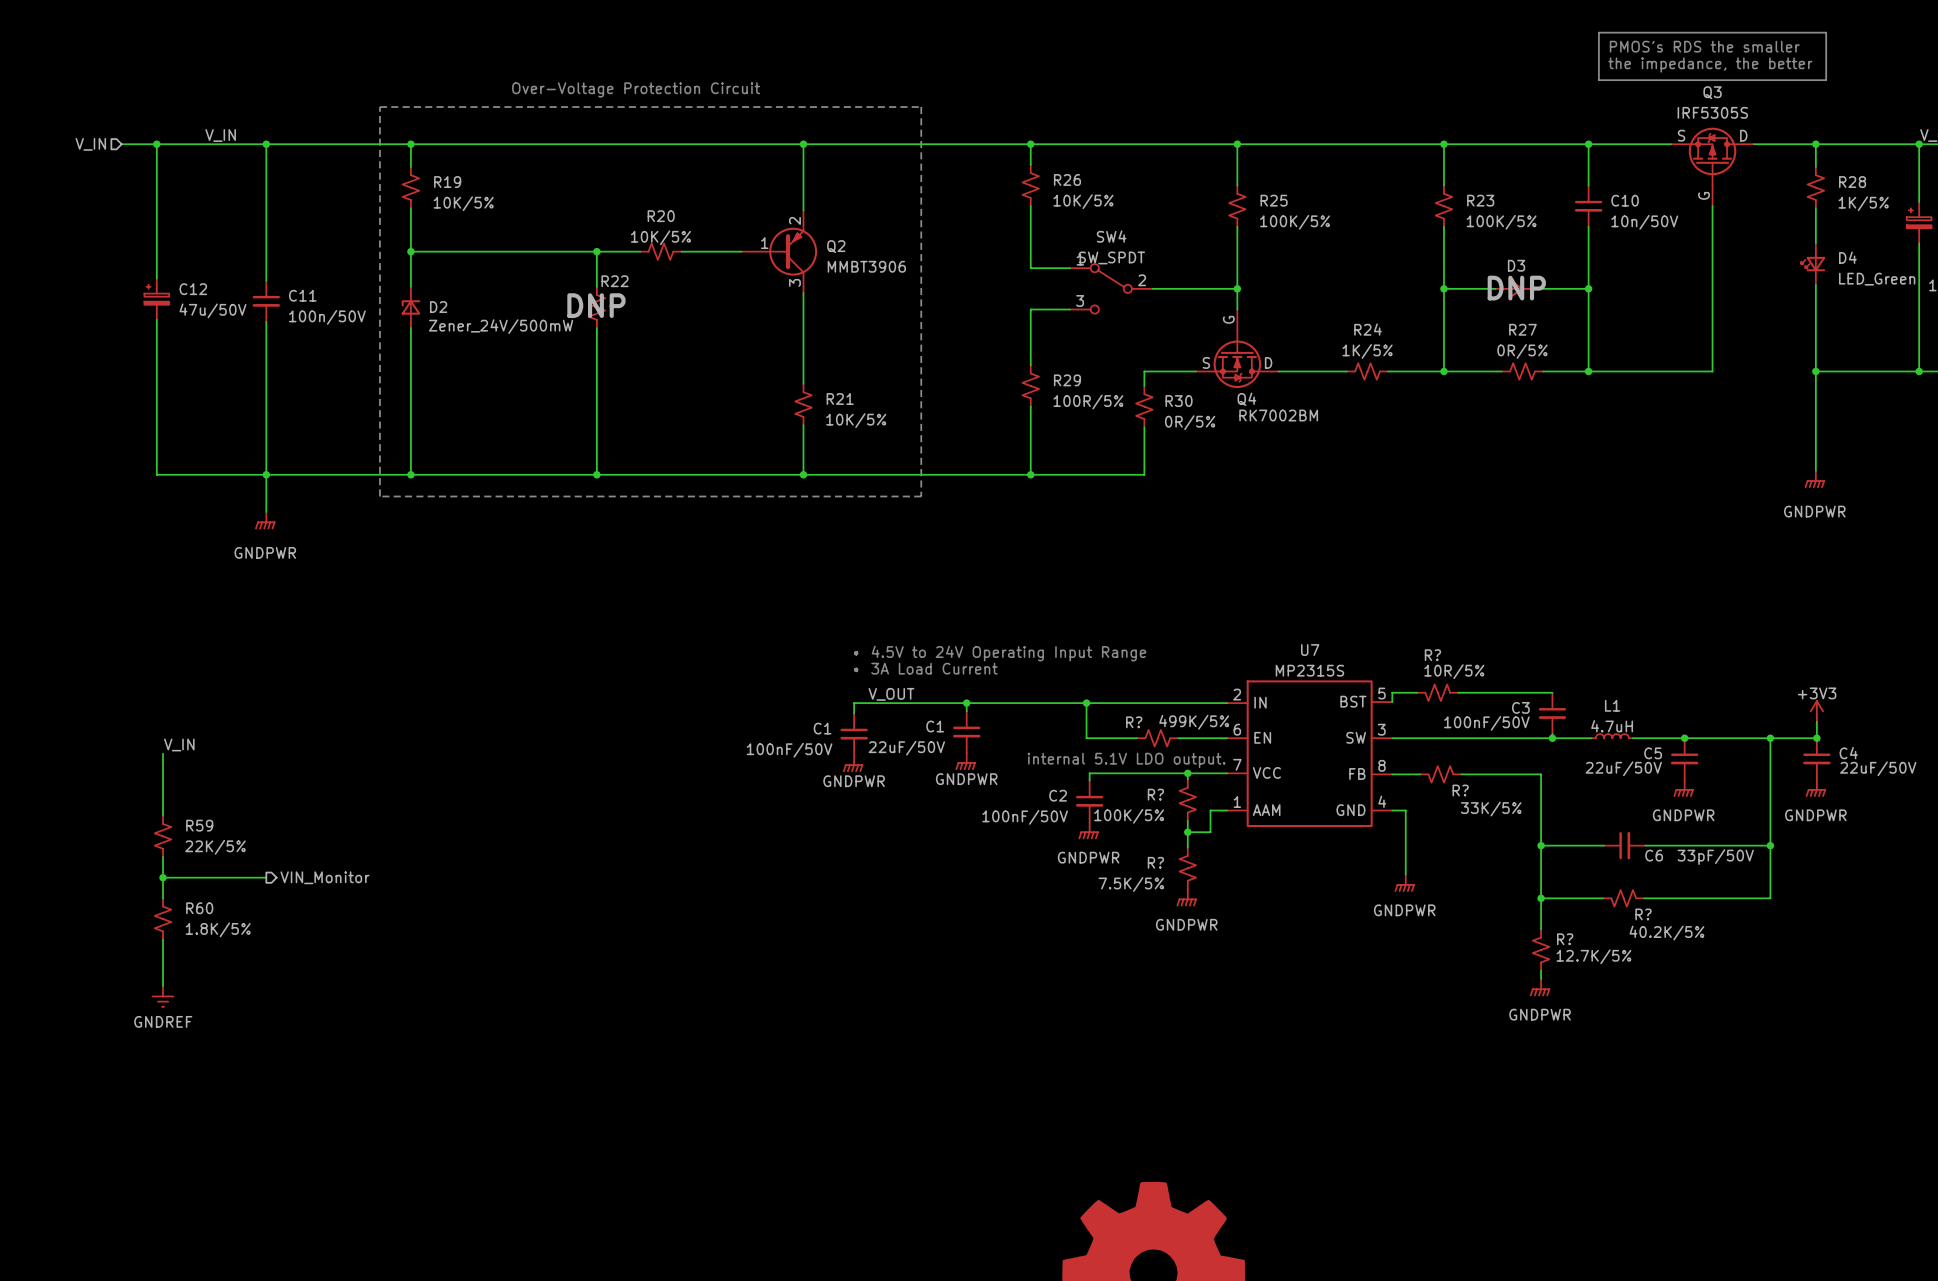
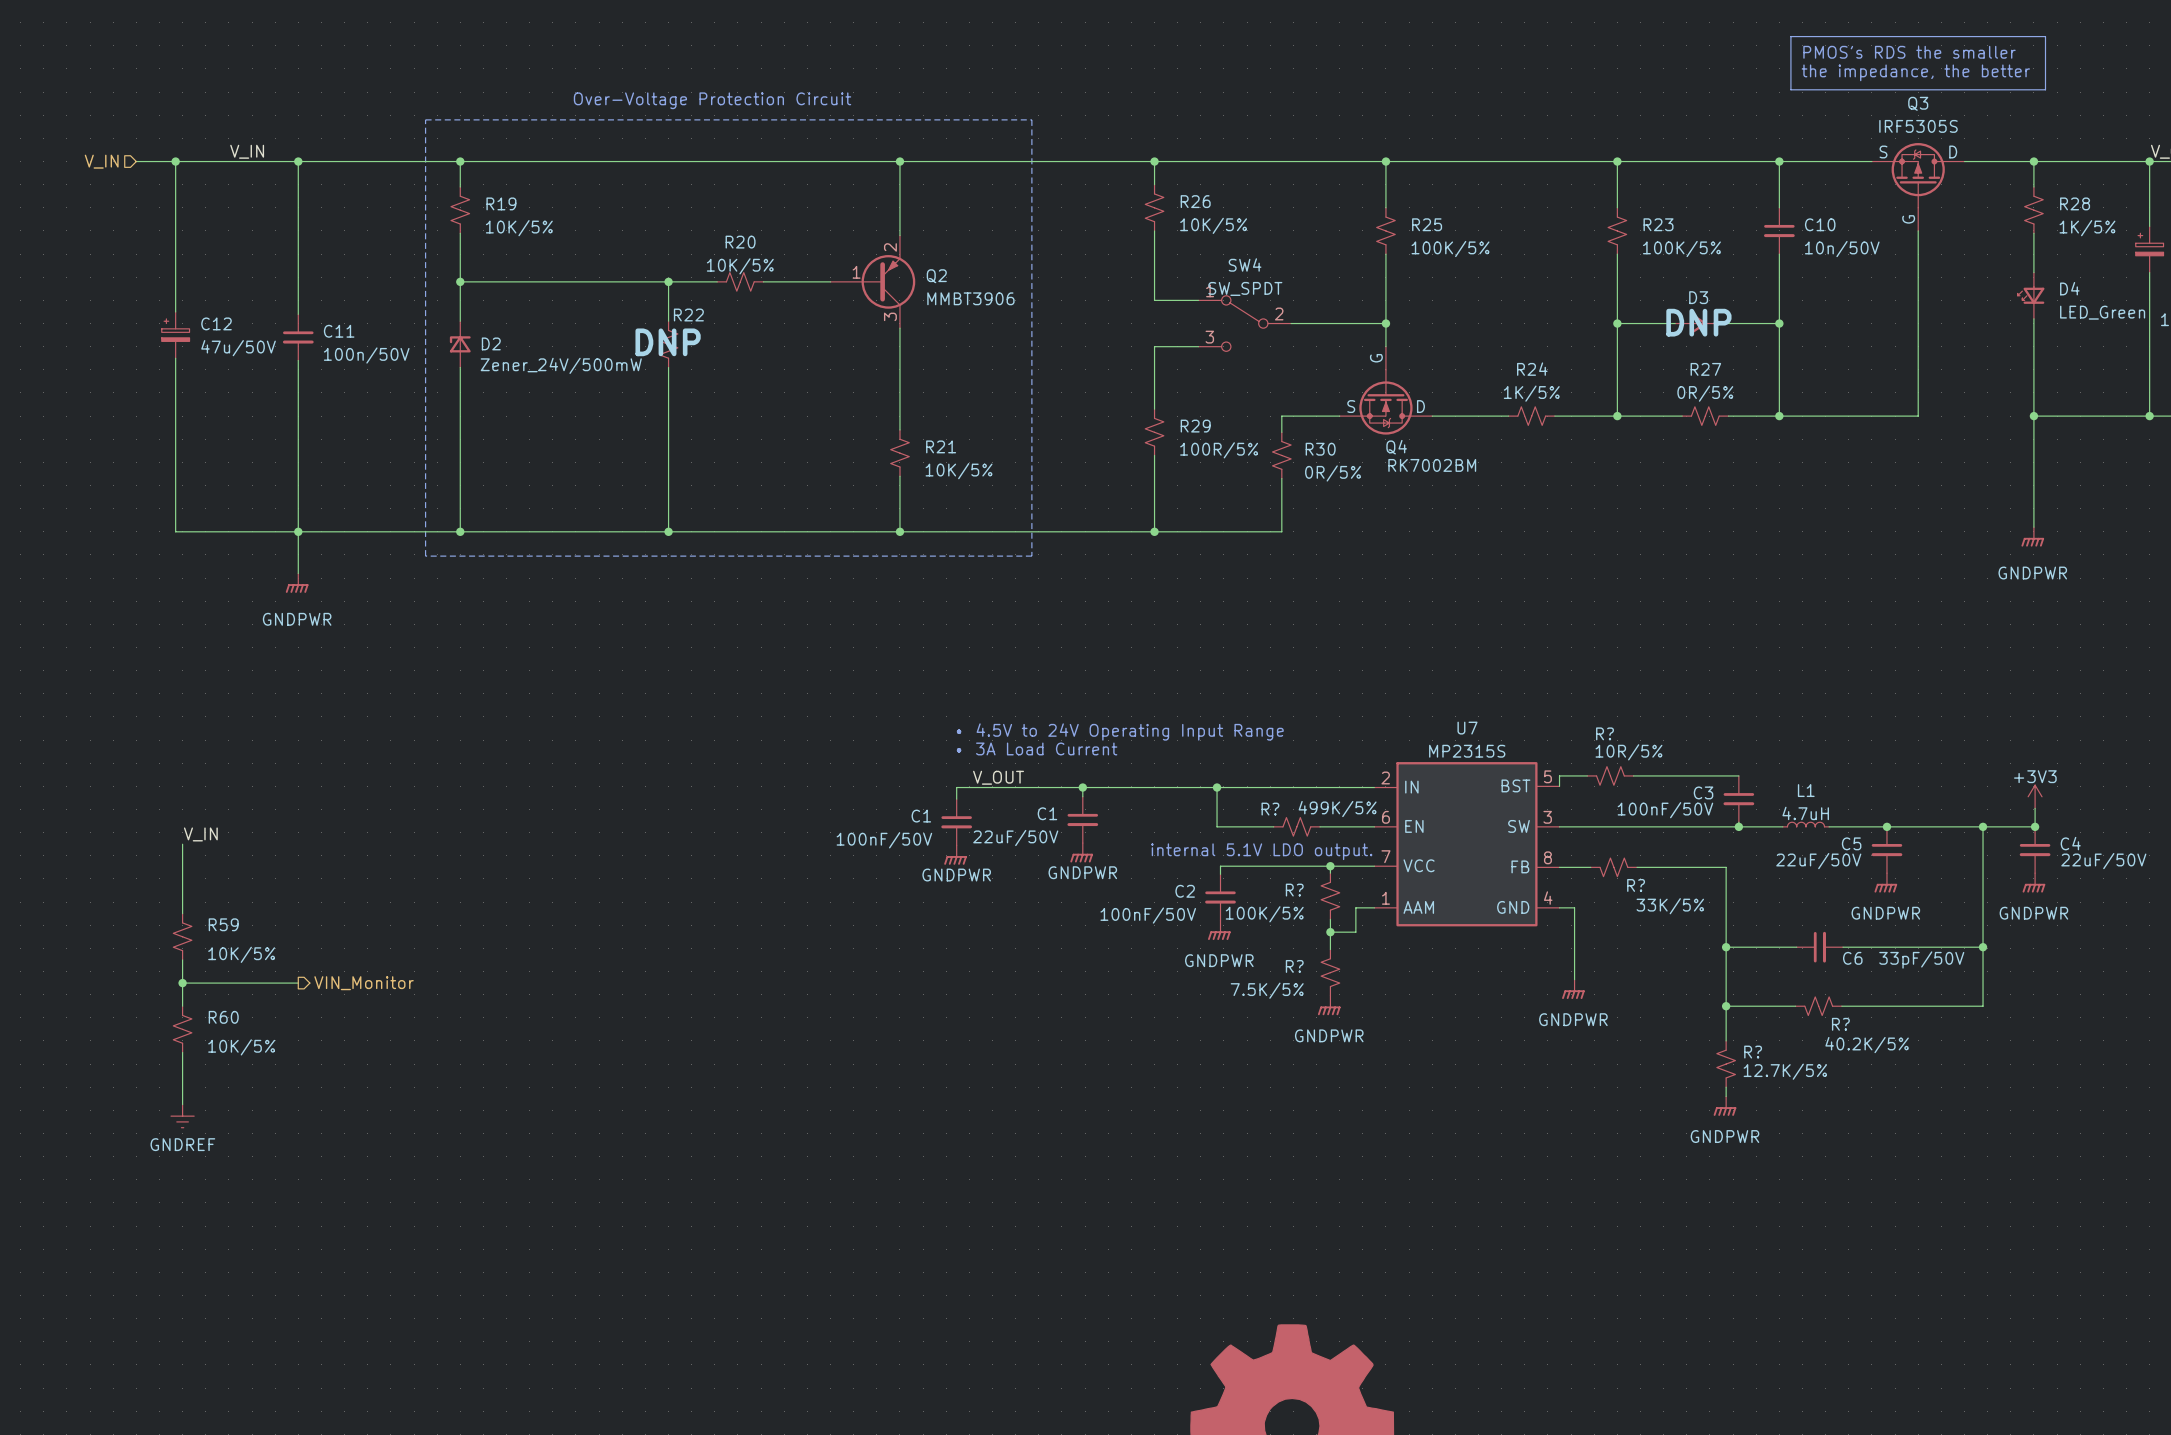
R59 value: 22K/5% (215, 847) -> 10K/5% (241, 954)
R60 value: 1.8K/5% (218, 929) -> 10K/5% (241, 1047)

